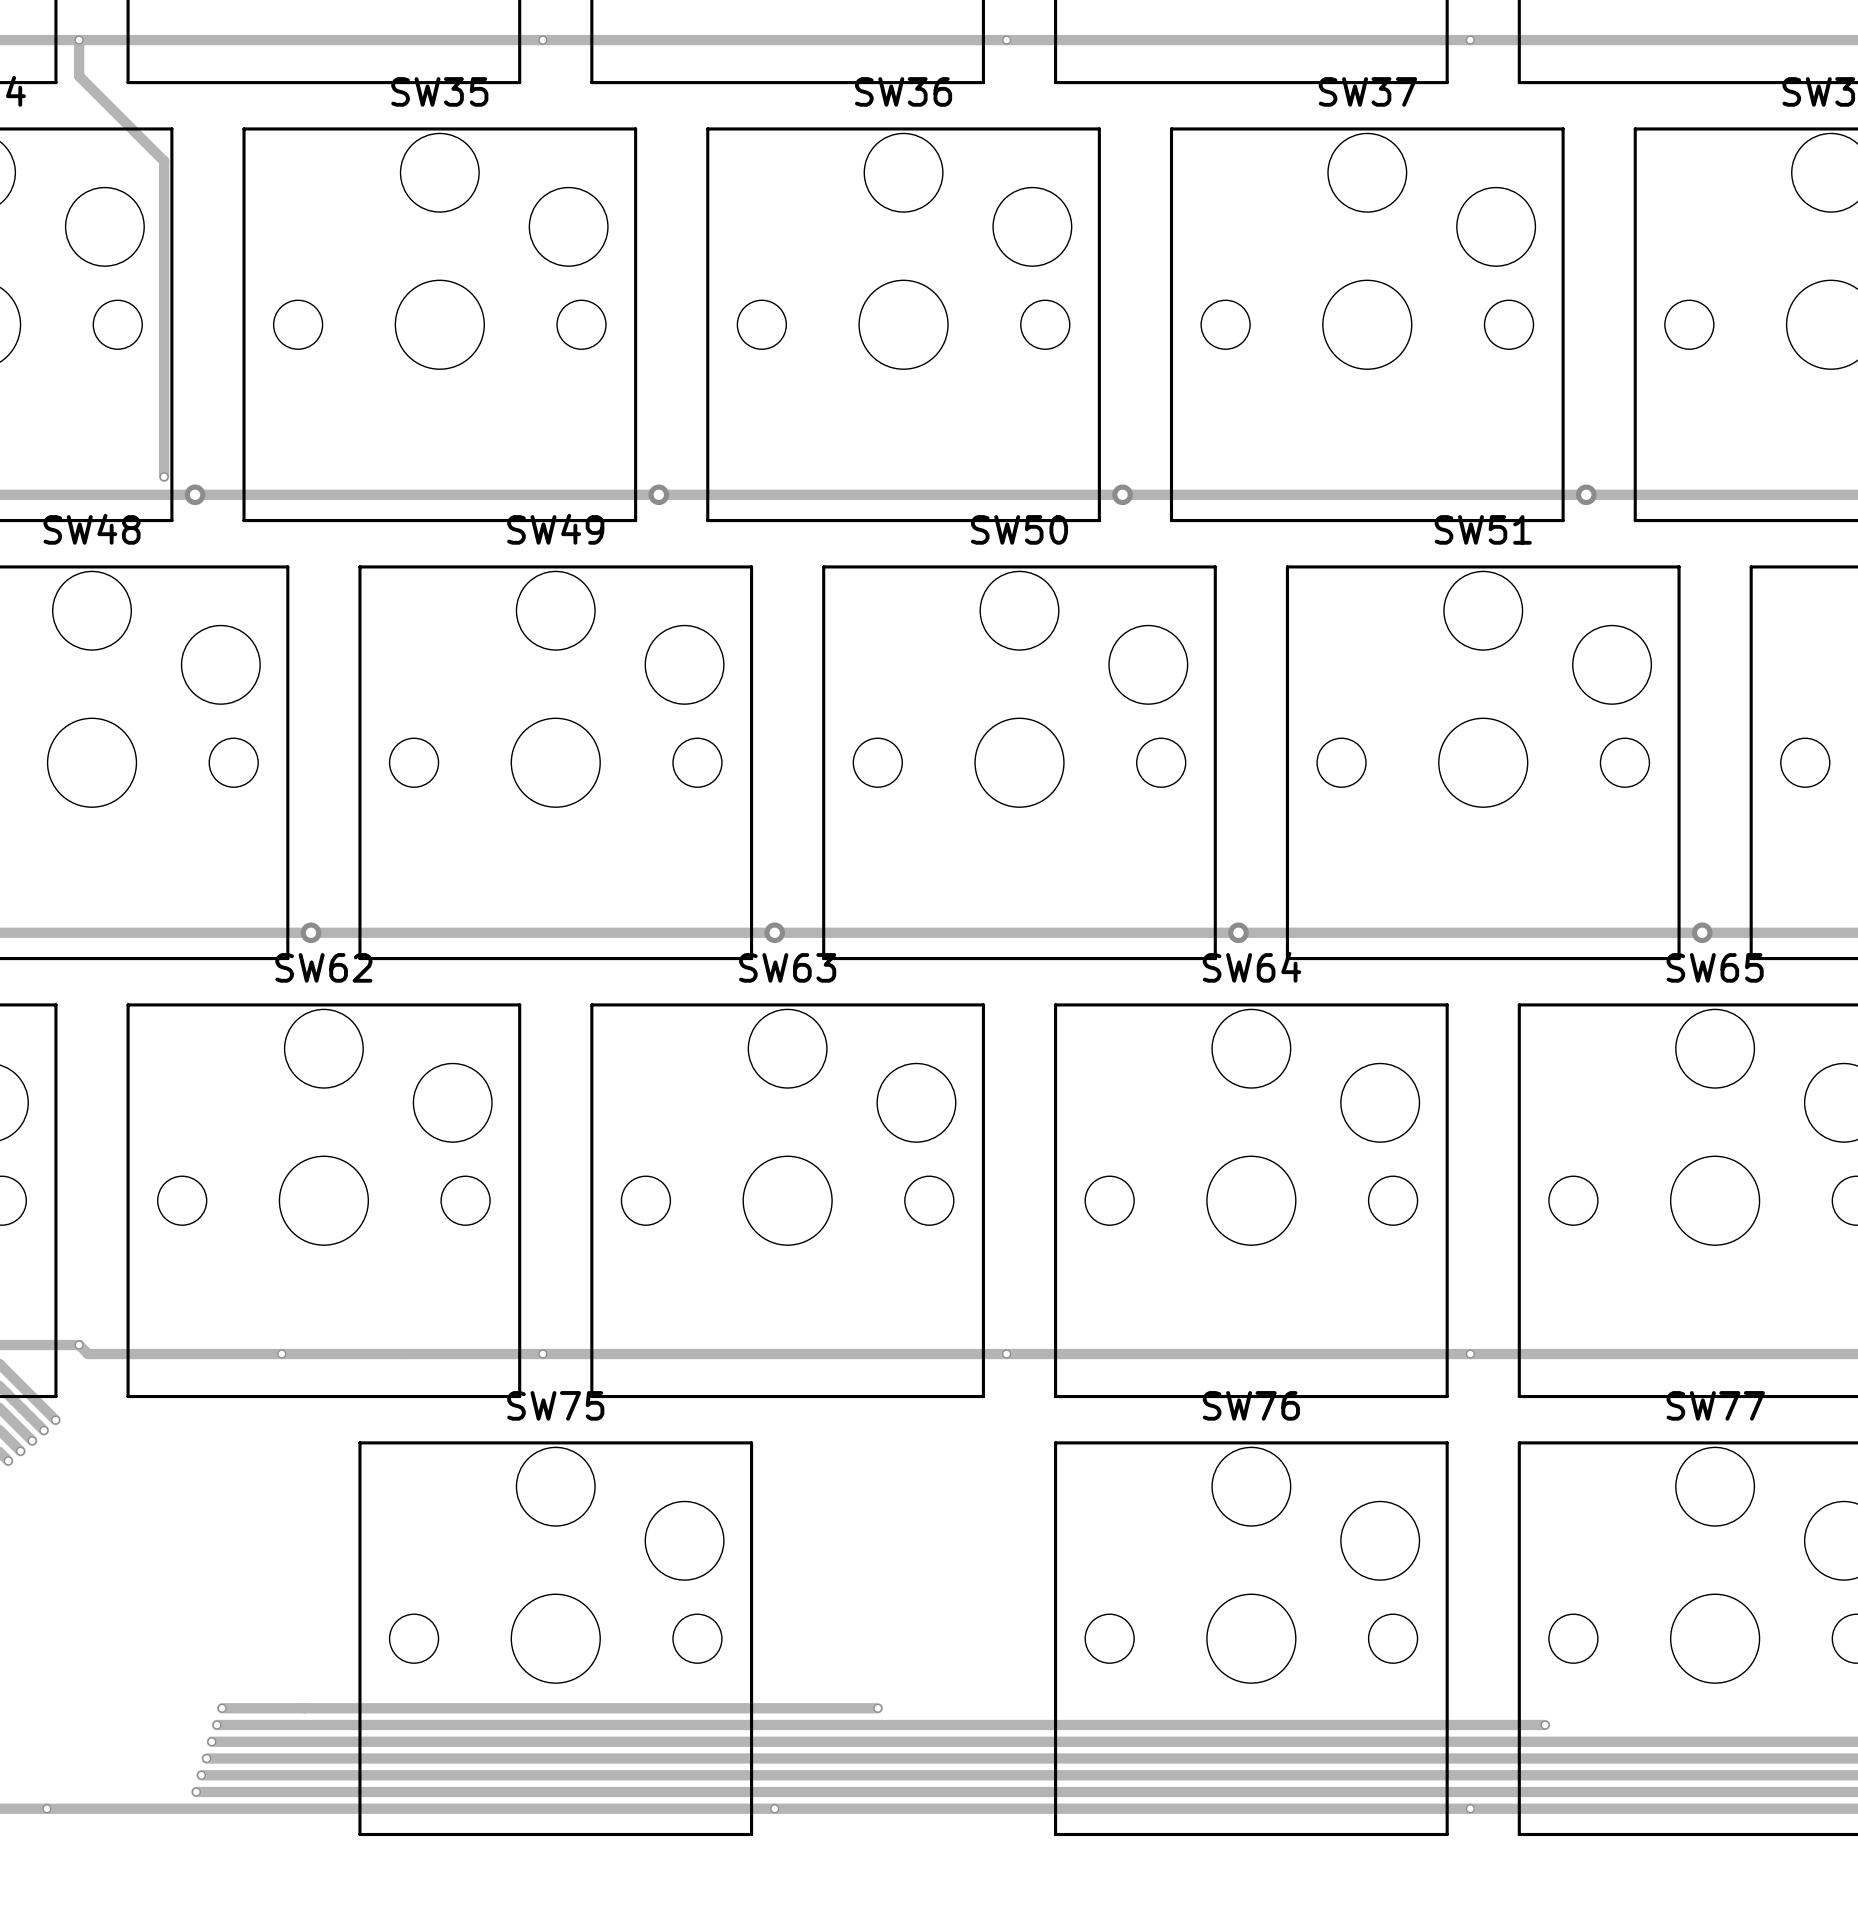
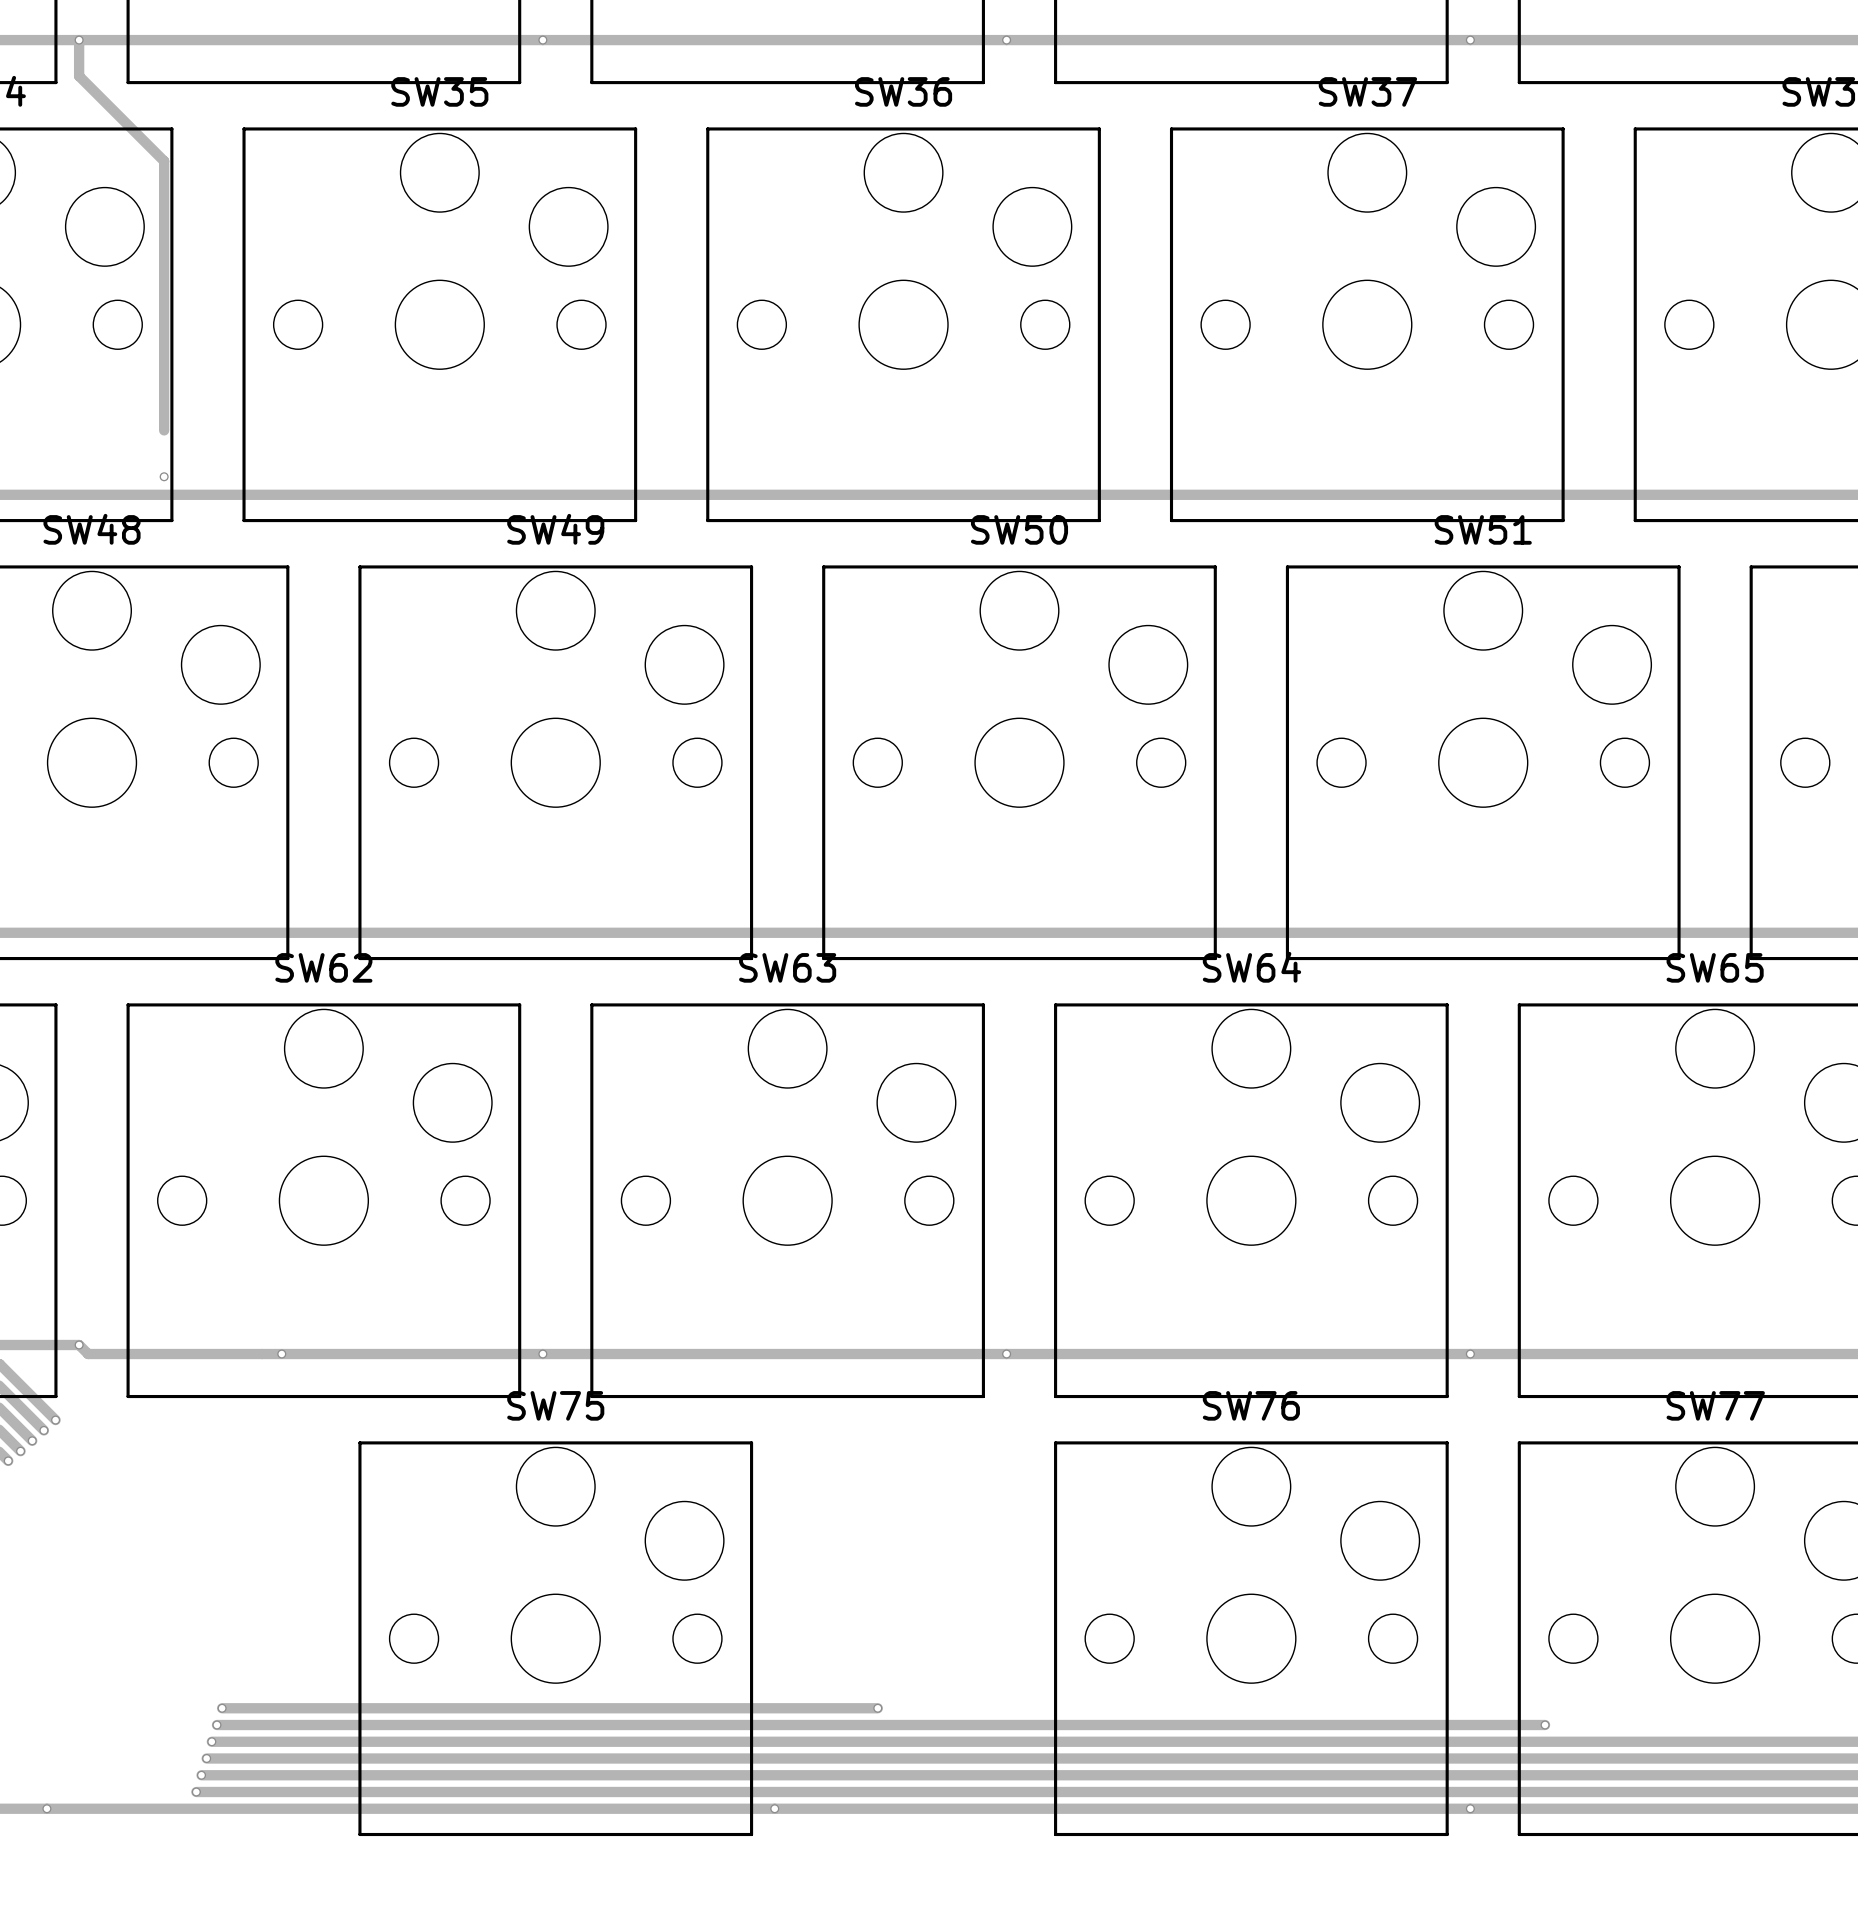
track: (164, 430) (164, 476) -> none
via: (195, 494) -> none
via: (658, 494) -> none
via: (1122, 494) -> none
via: (1586, 494) -> none
via: (311, 932) -> none
via: (774, 932) -> none
via: (1238, 932) -> none
via: (1702, 932) -> none

